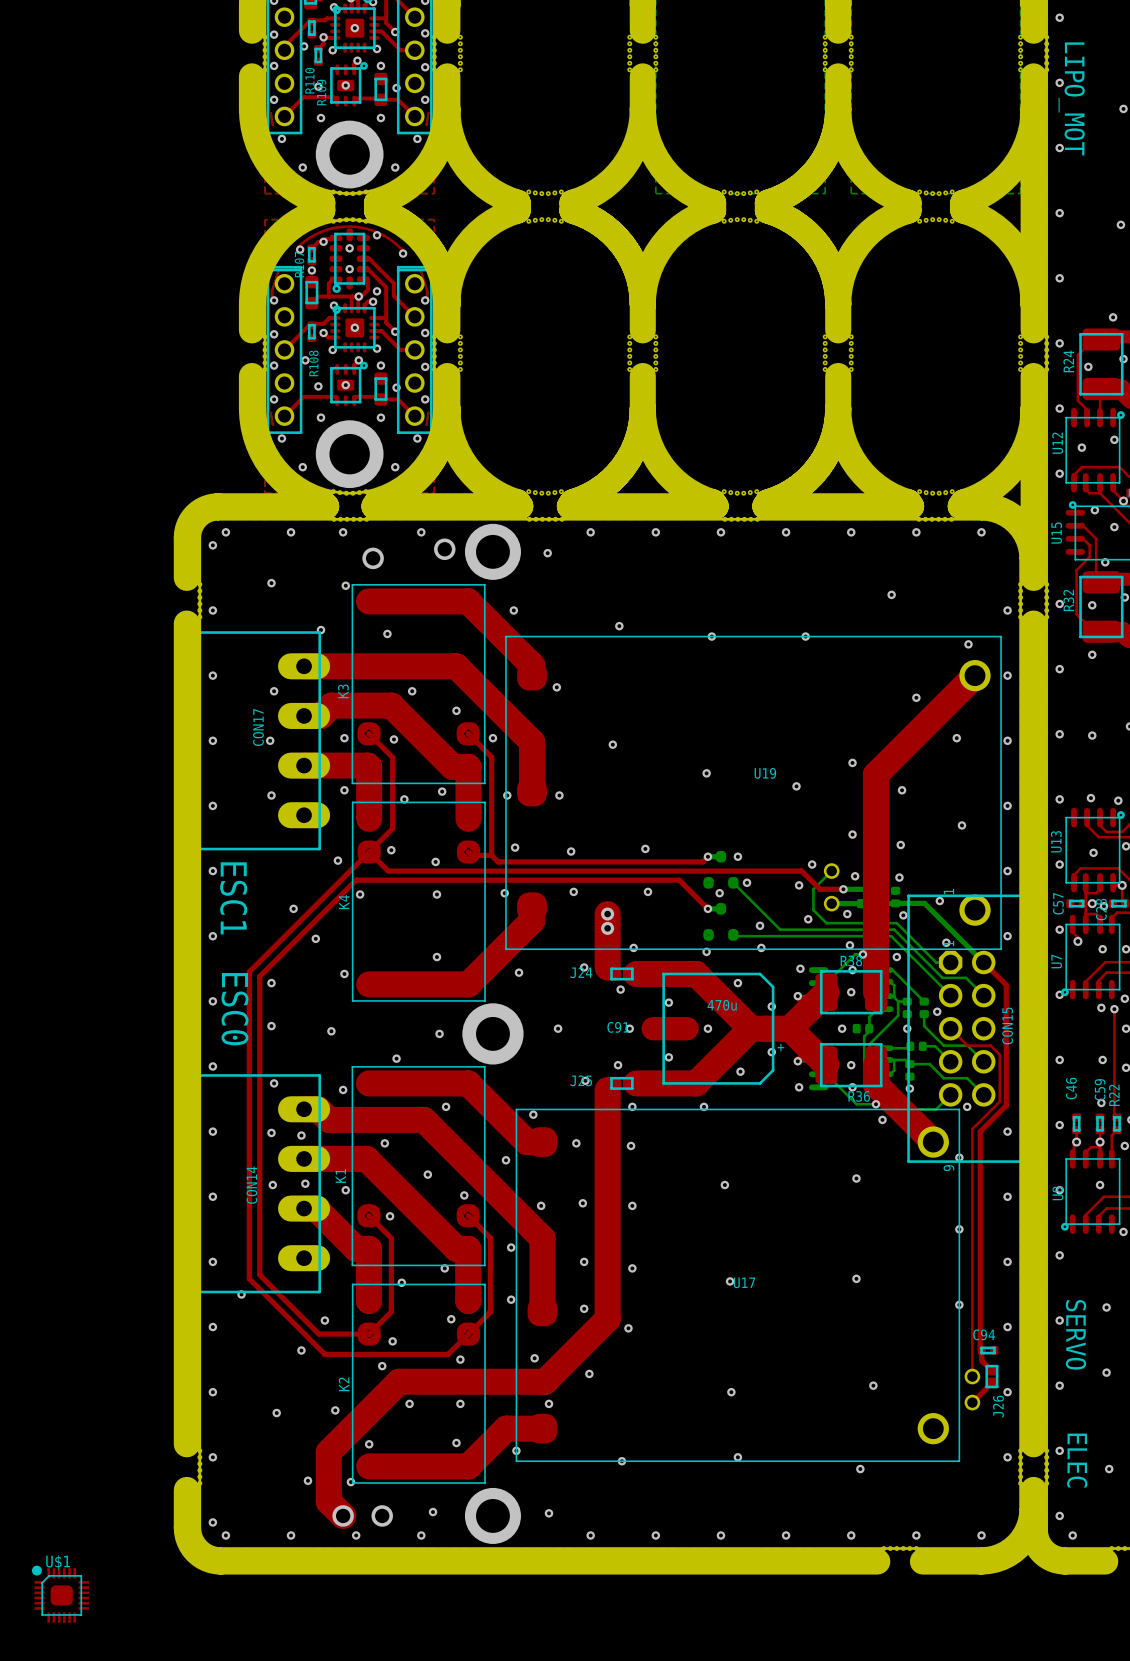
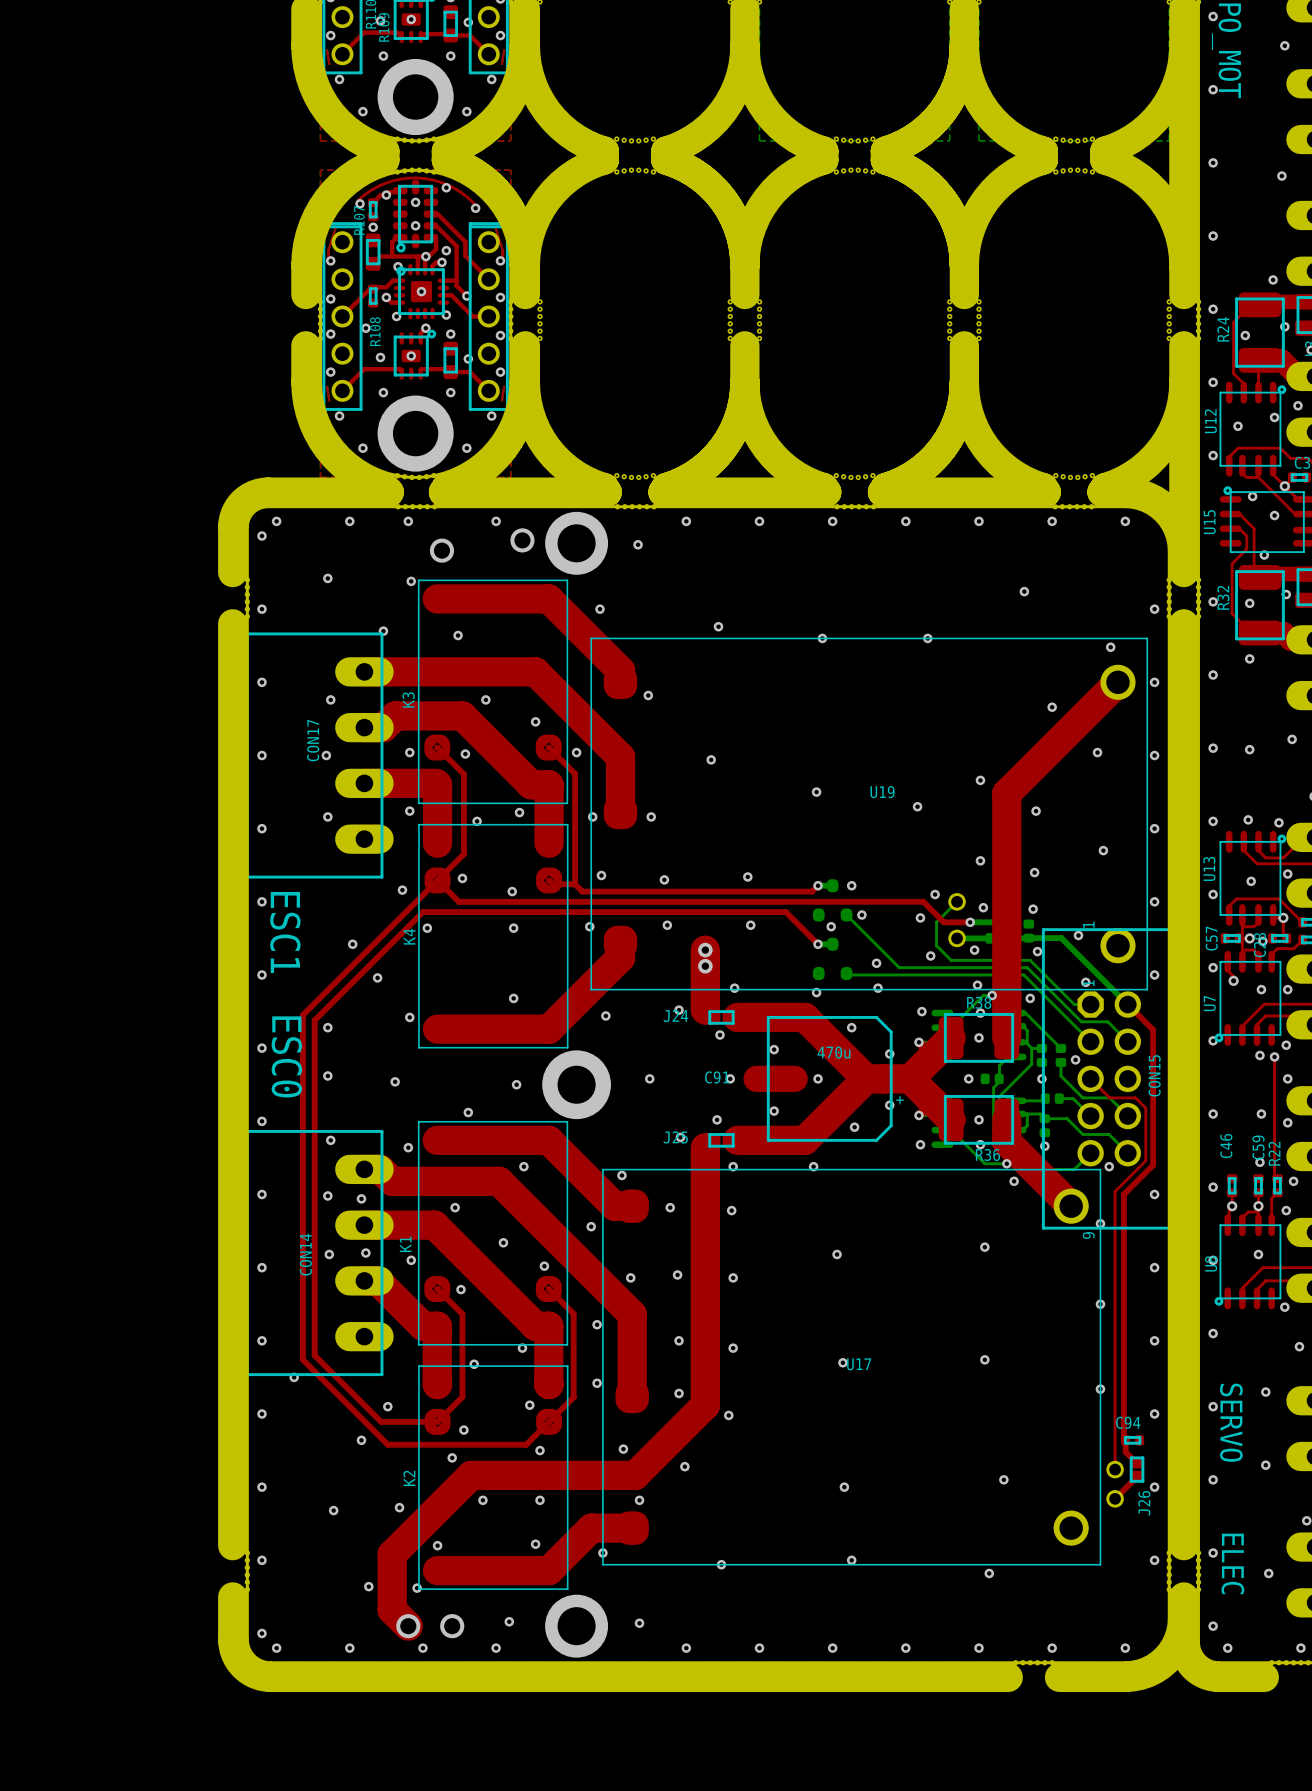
U$1: (60, 1594) -> none

